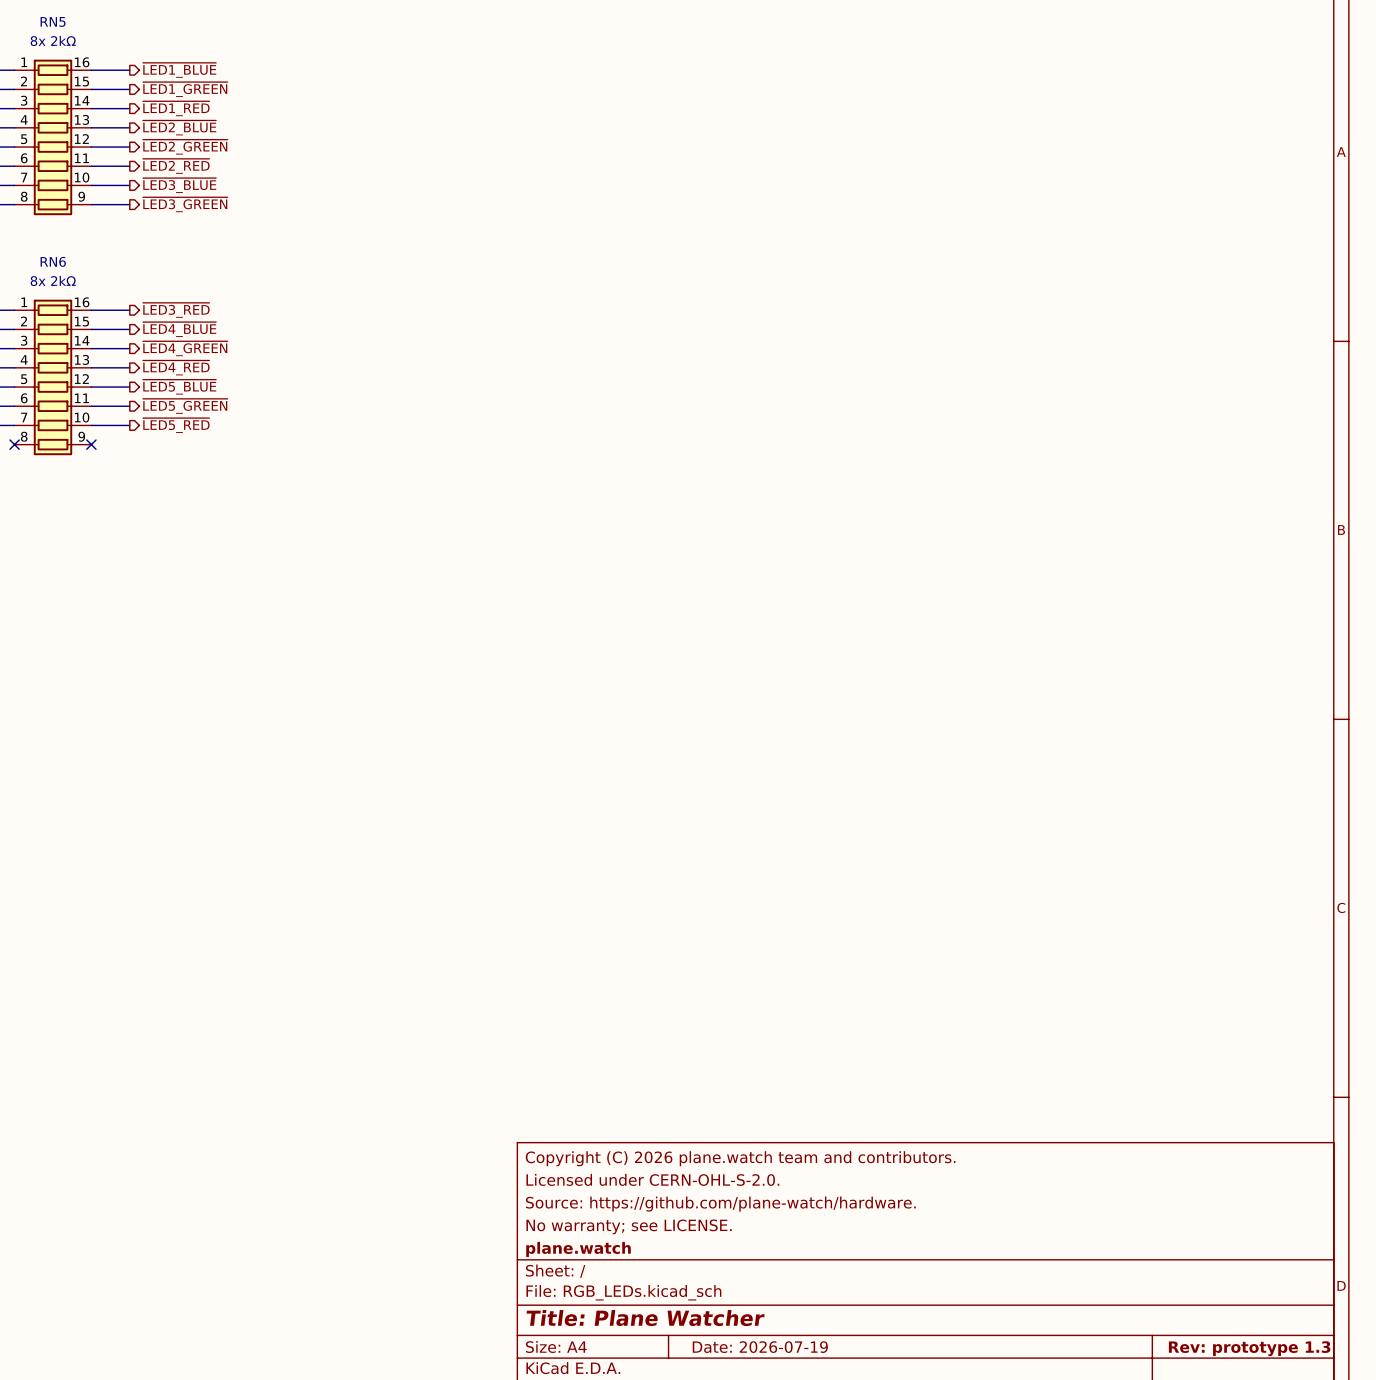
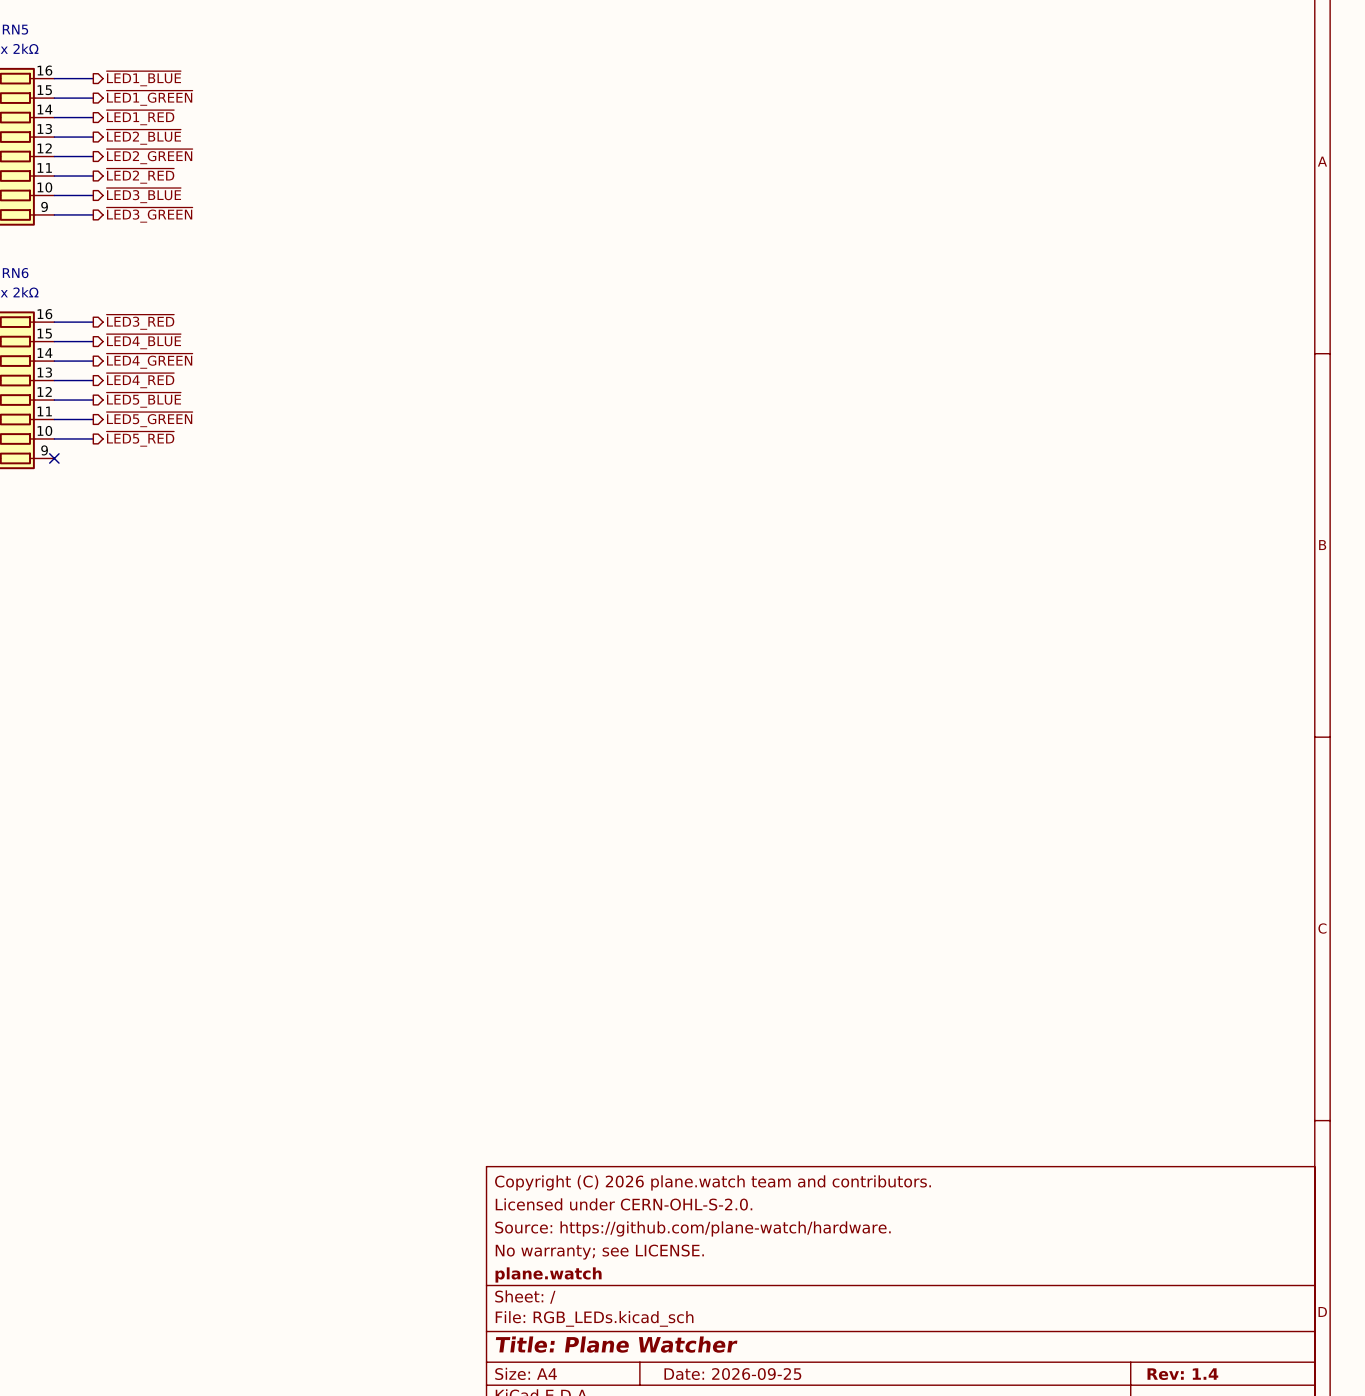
title block: Date: 2026-07-19 (760, 1347) -> Date: 2026-09-25 (732, 1374)
title block: Rev: prototype 1.3 (1249, 1348) -> Rev: 1.4 (1182, 1374)

